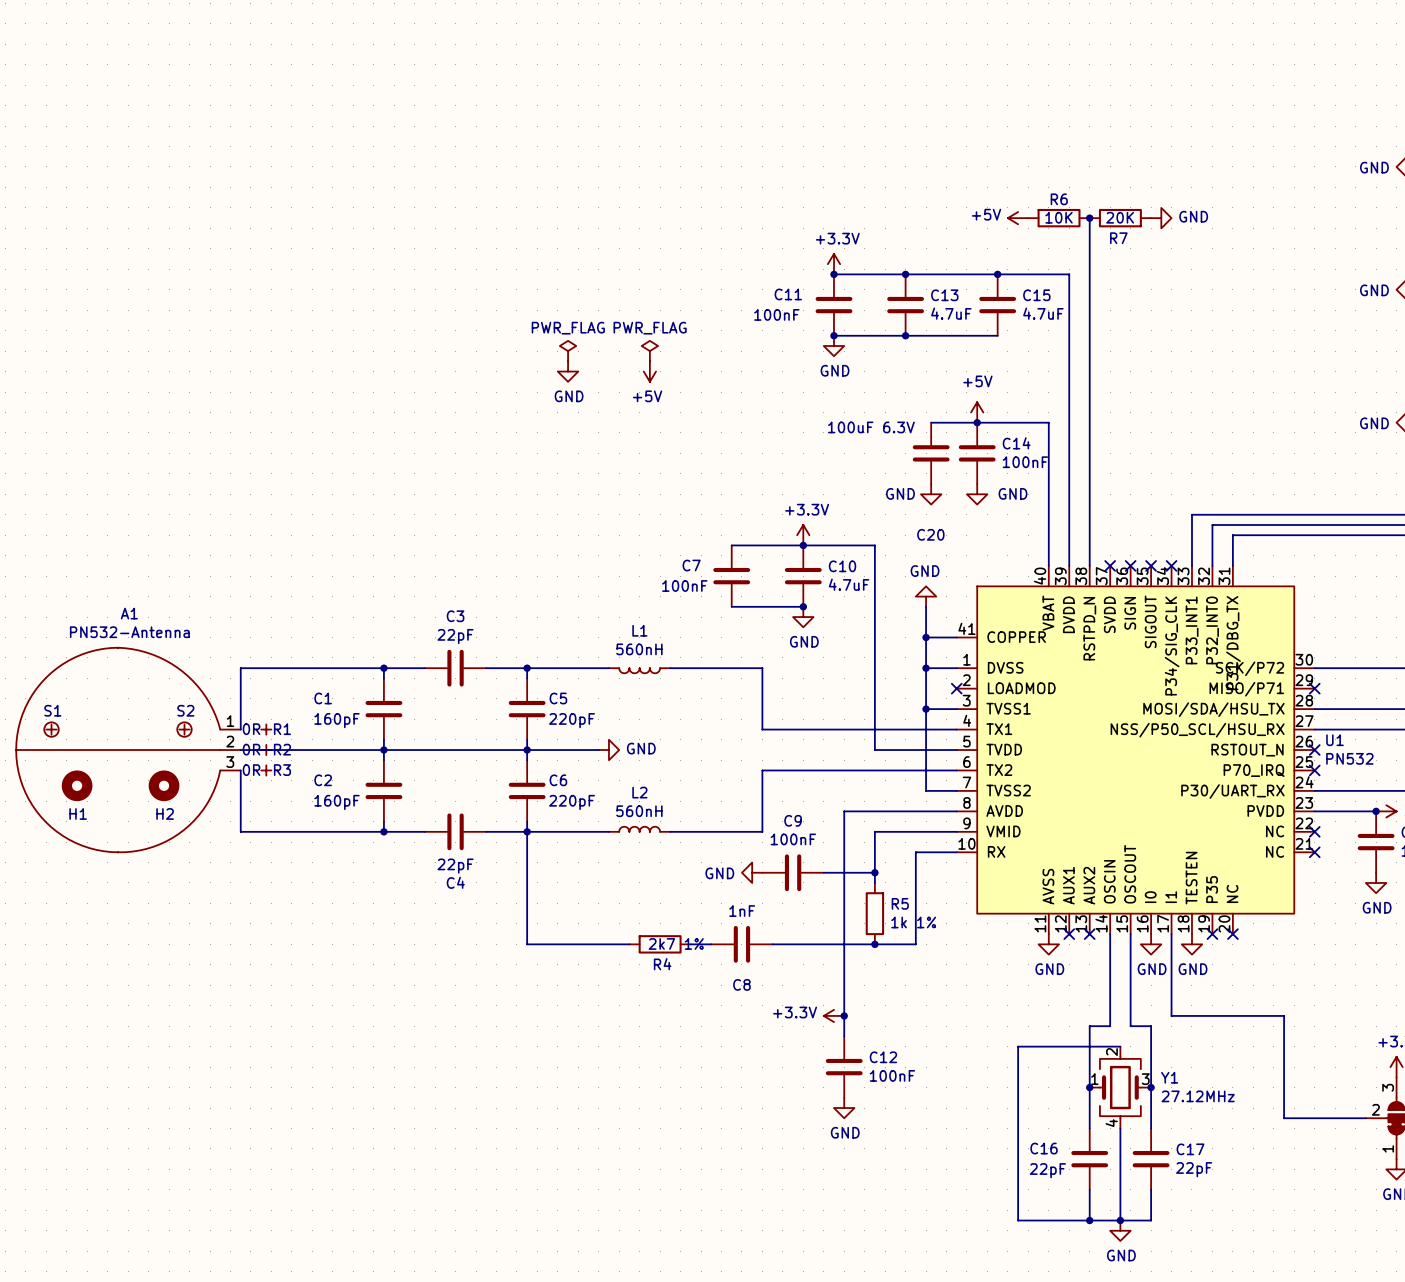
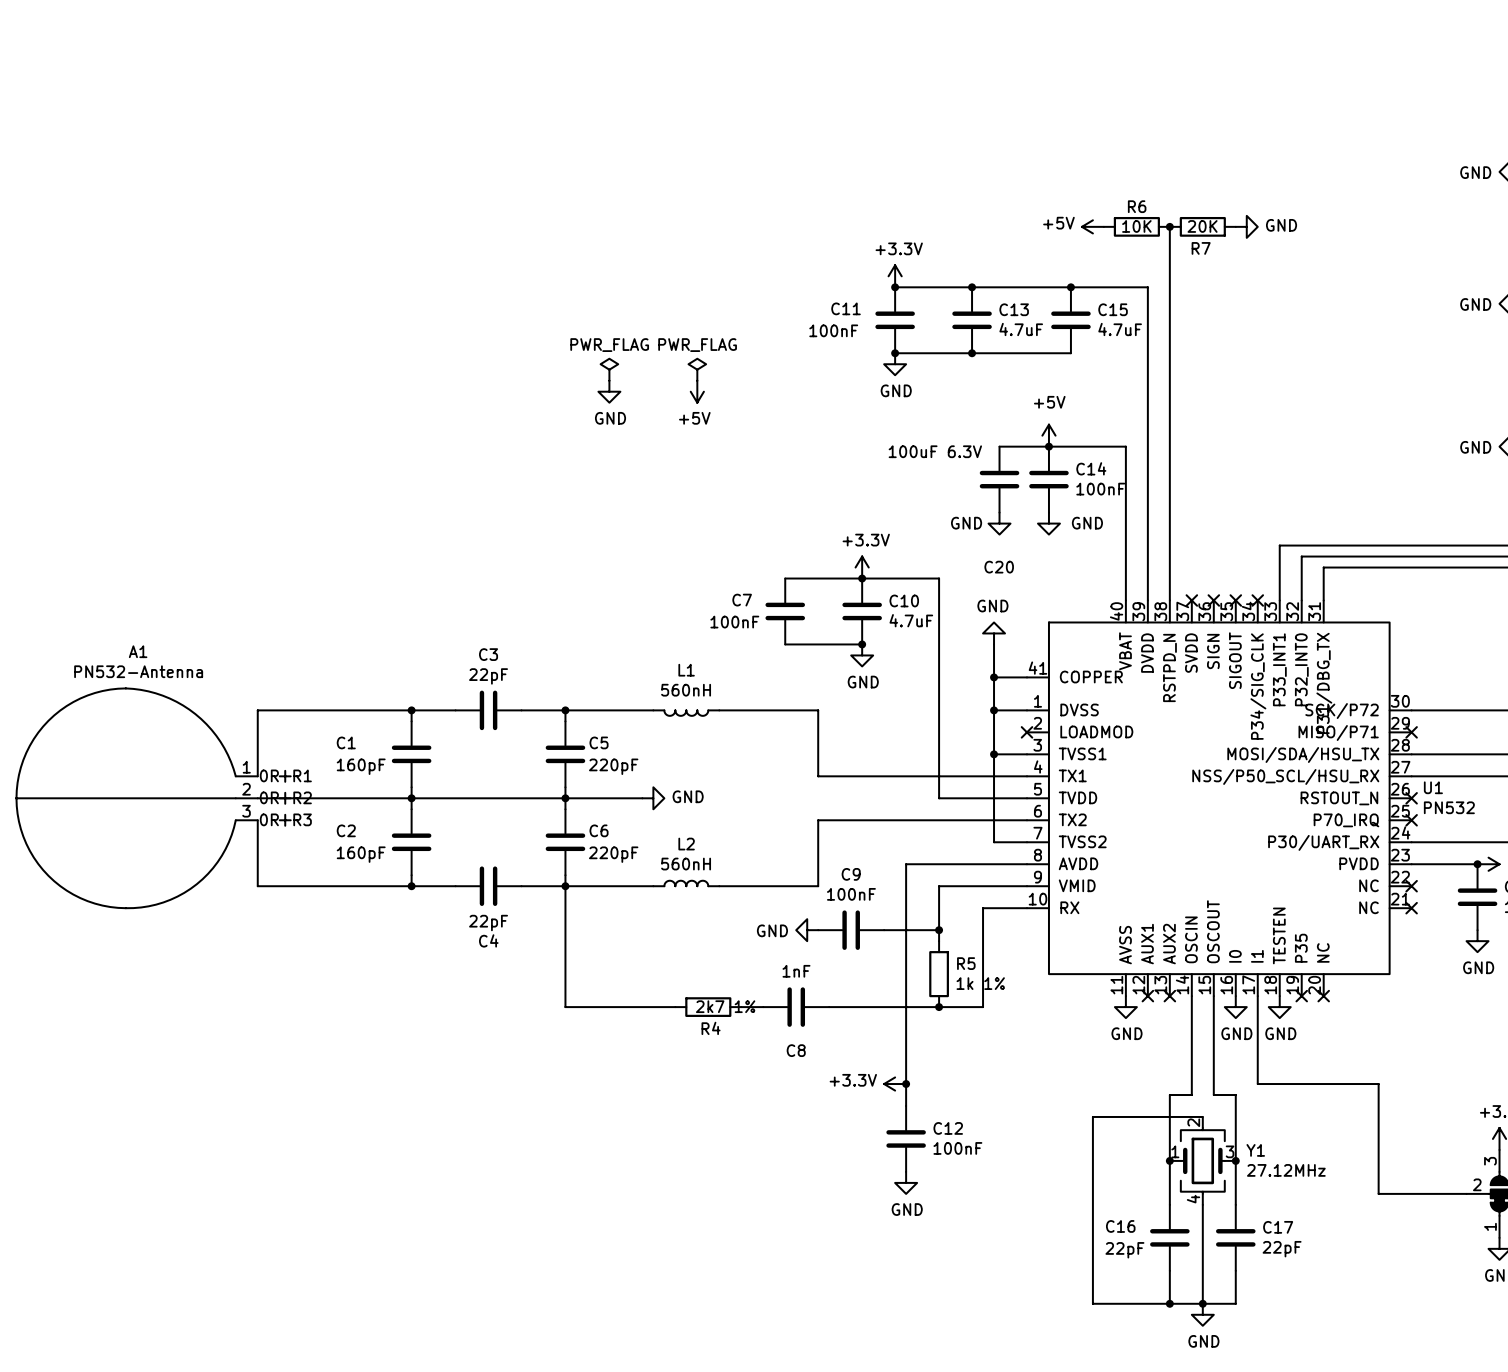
S1: (51, 729) -> none
S2: (184, 729) -> none
H1: (77, 785) -> none
H2: (164, 785) -> none

